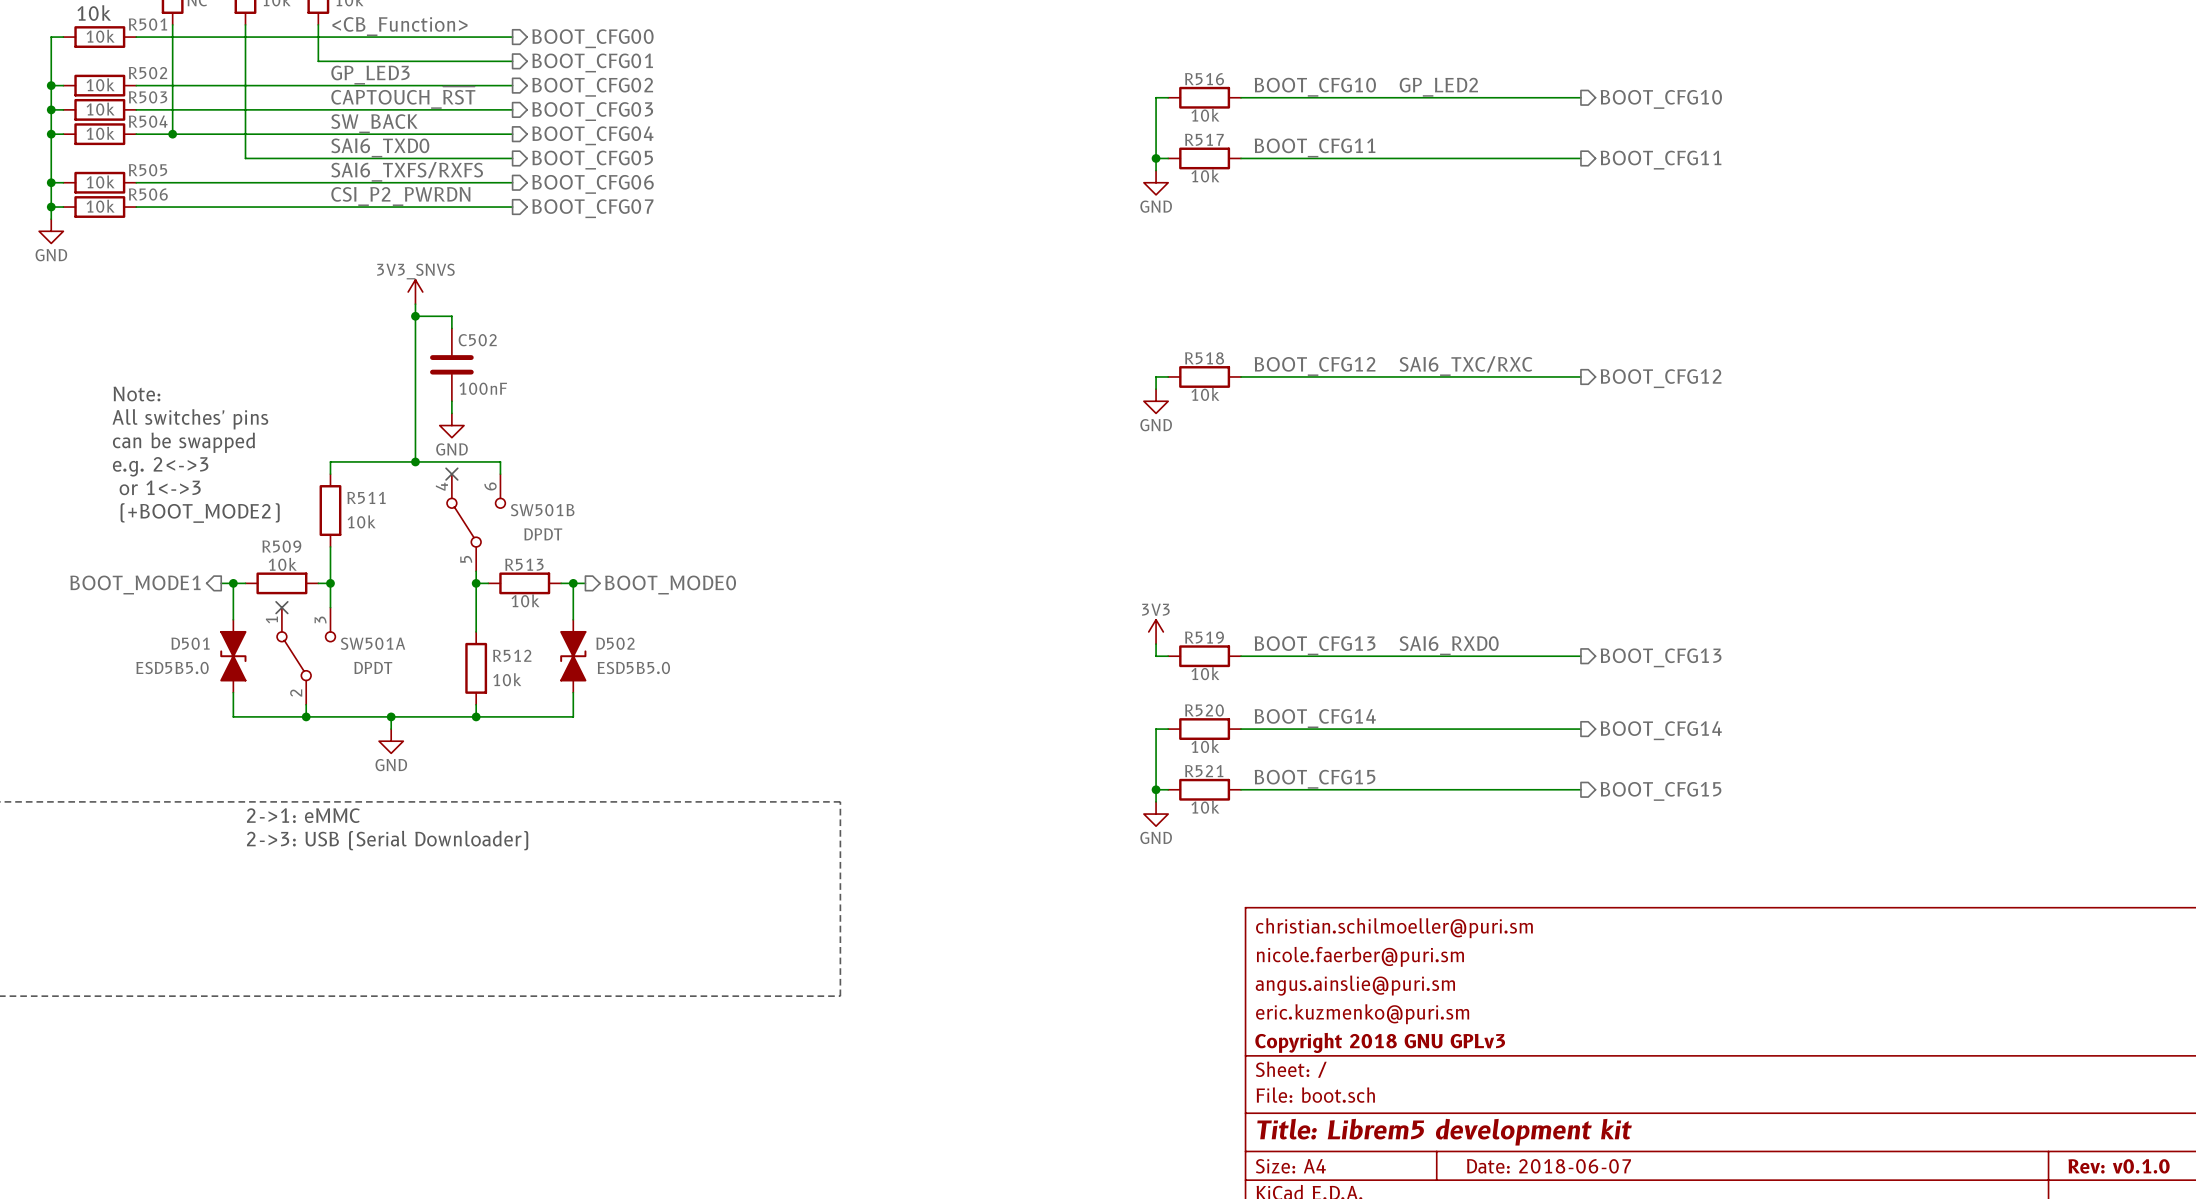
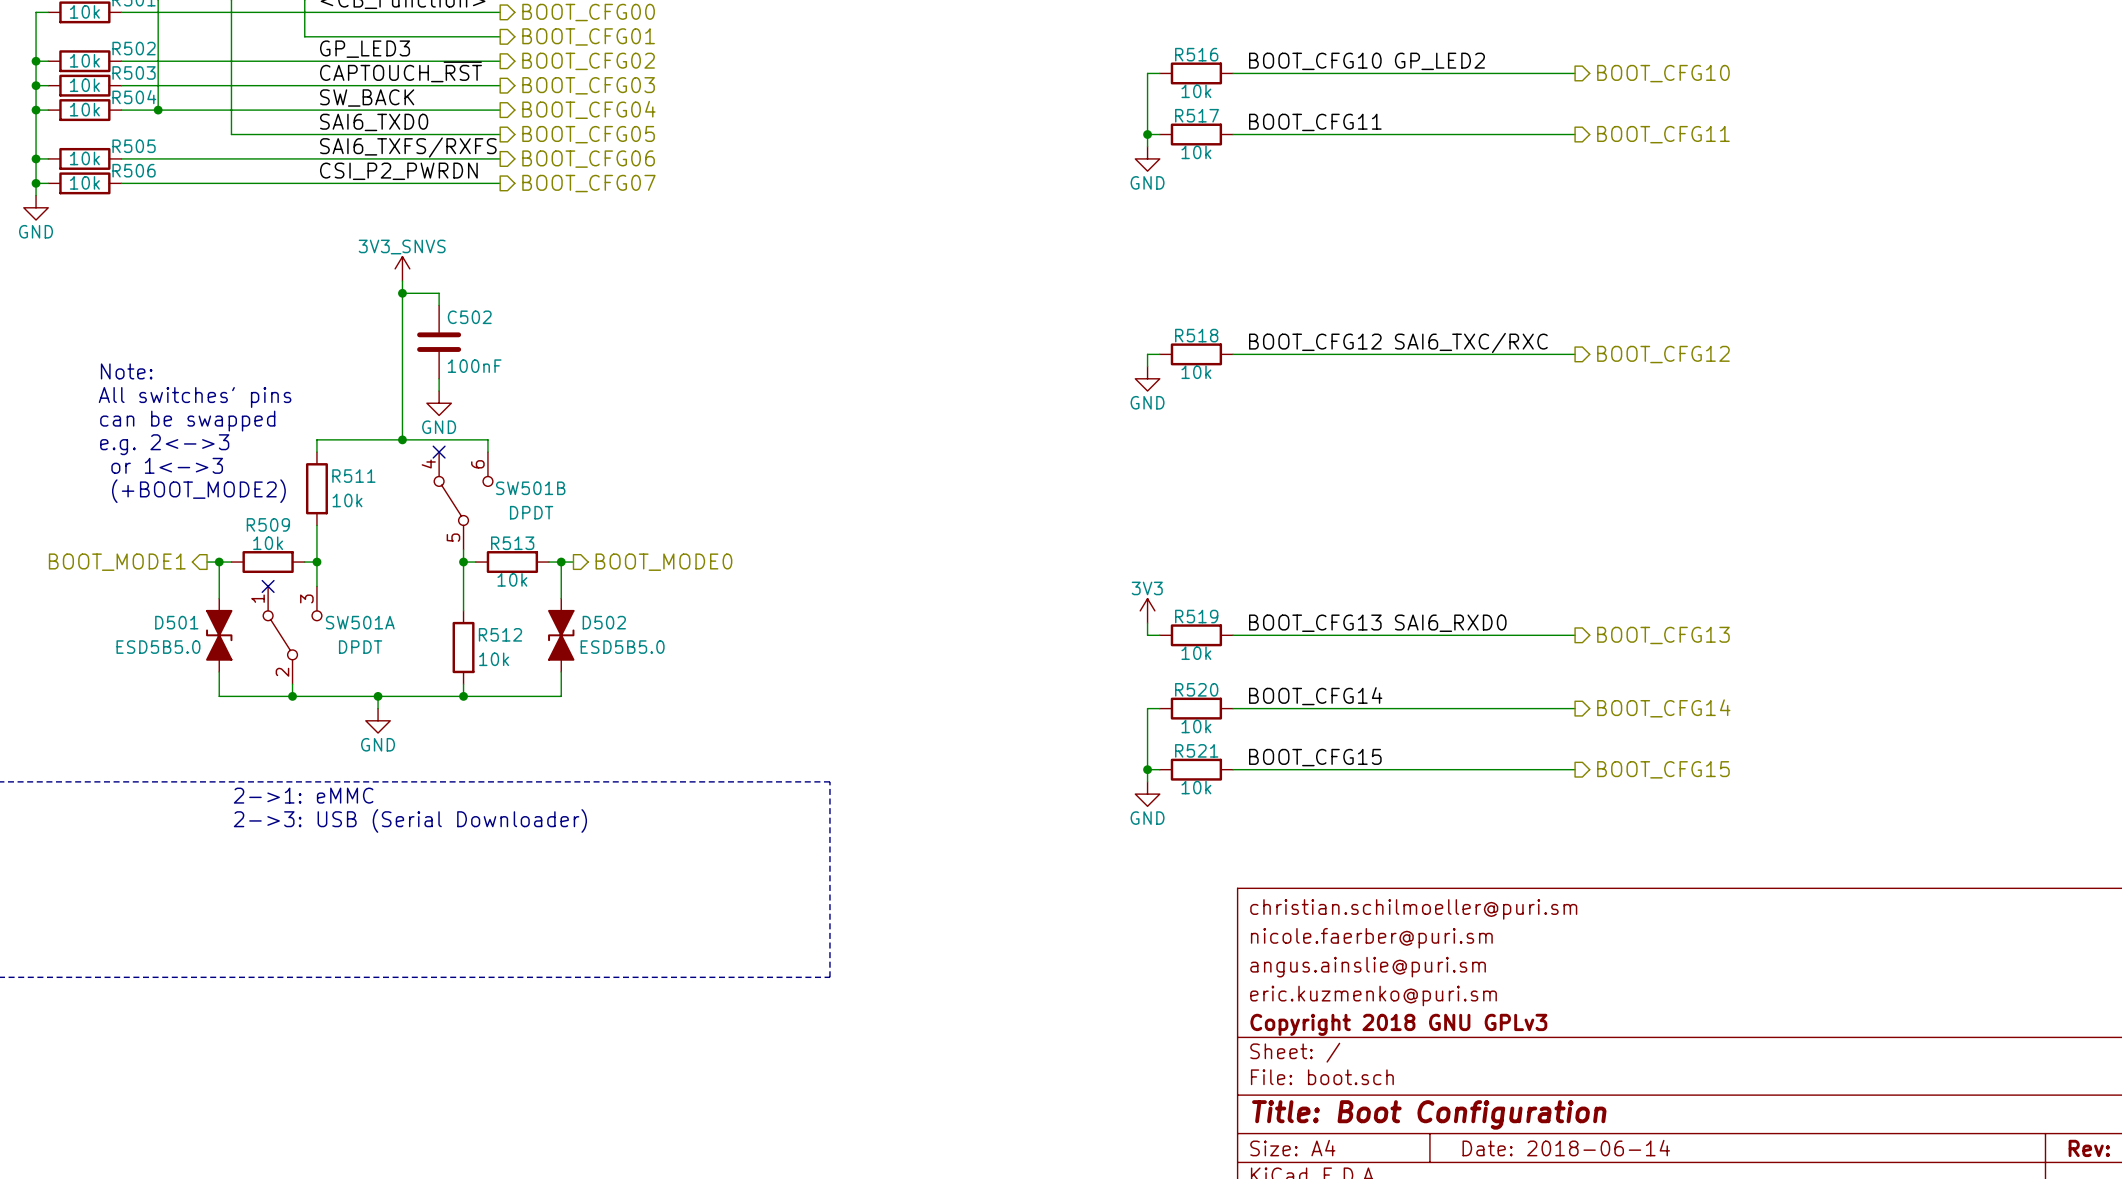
title block: Title: Librem5 development kit (1444, 1132) -> Title: Boot Configuration (1429, 1114)
title block: Date: 2018-06-07 (1548, 1166) -> Date: 2018-06-14 (1566, 1148)

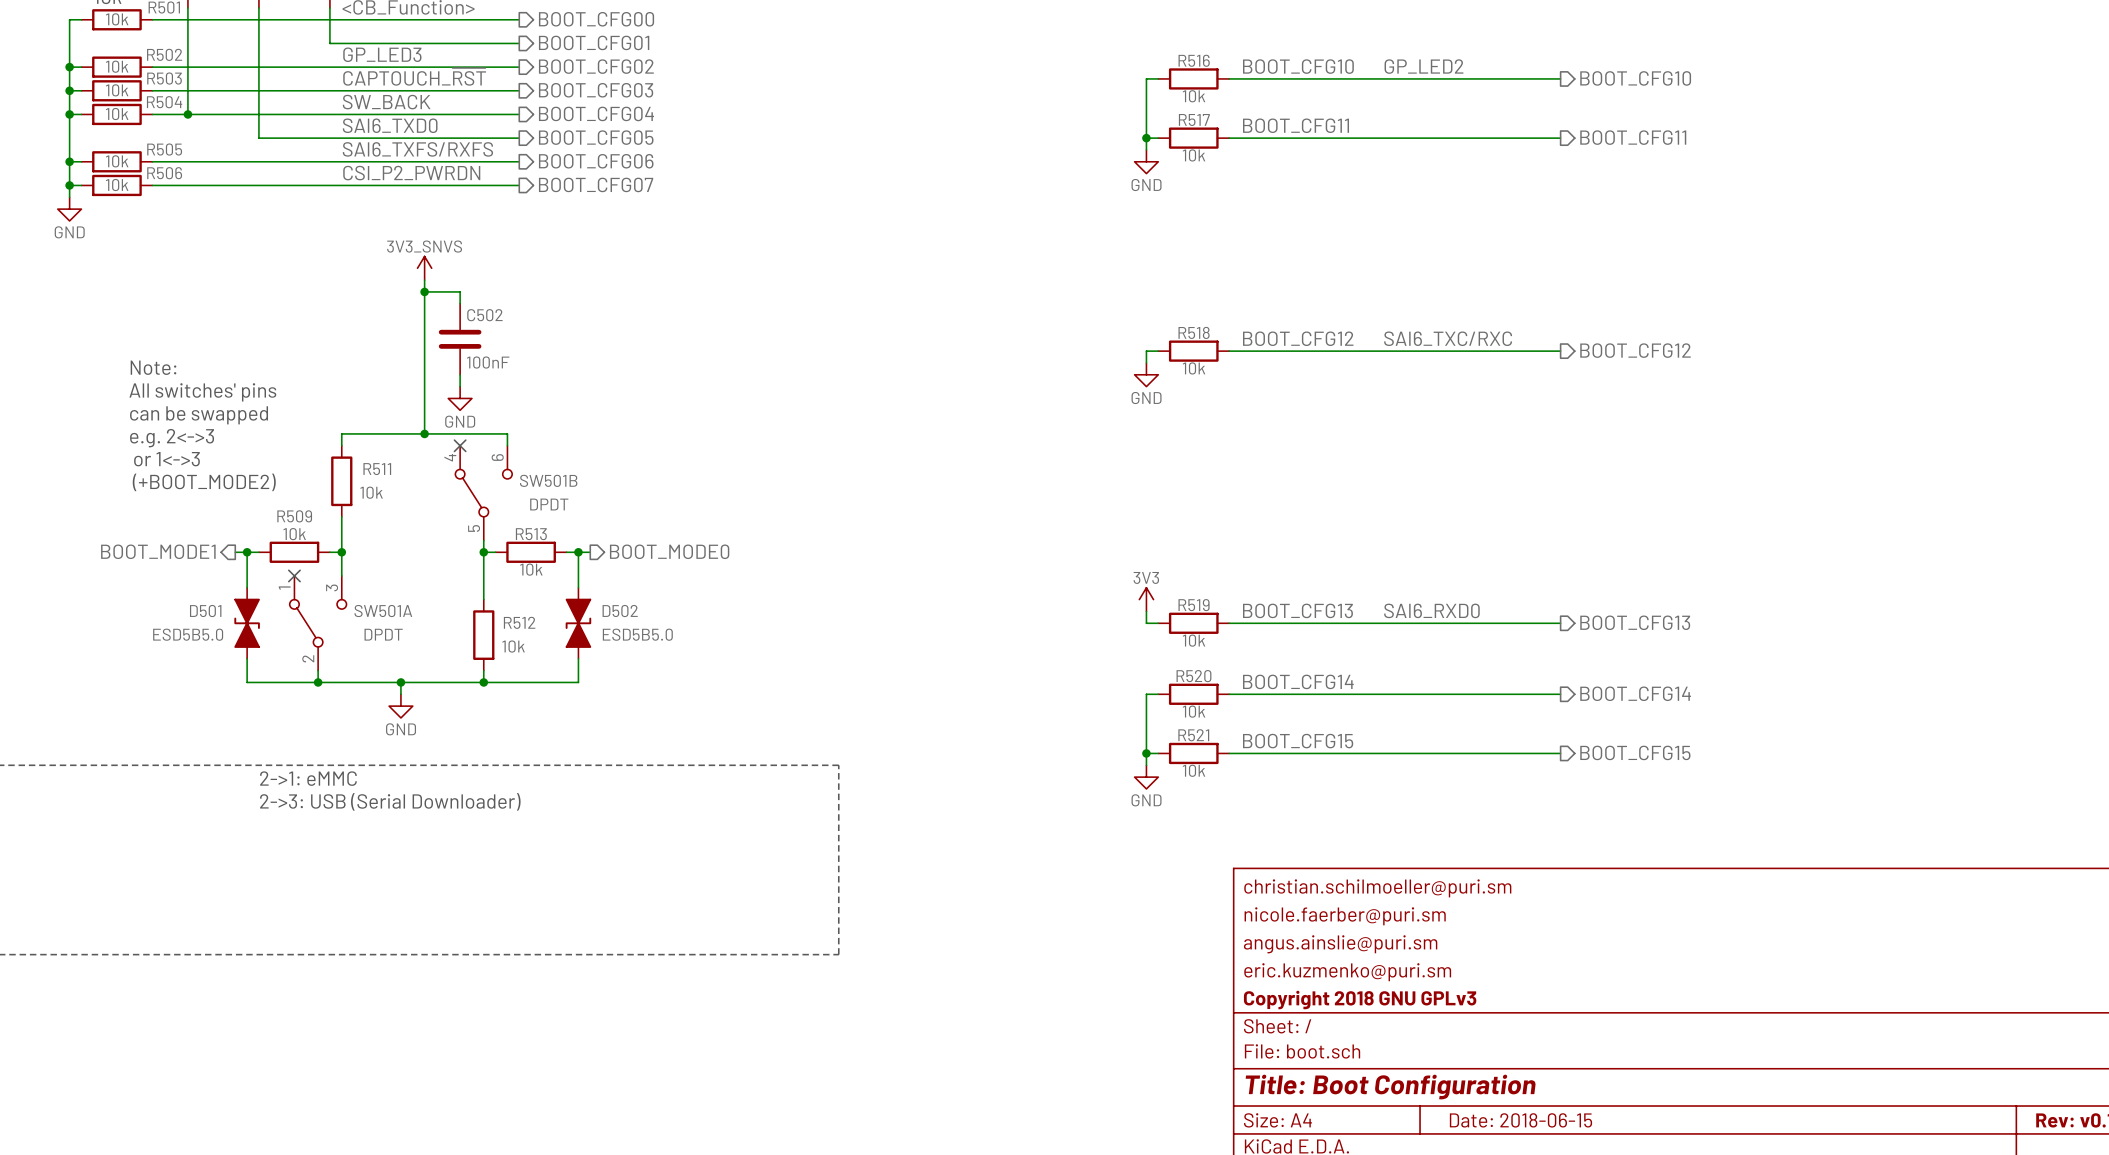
title block: Date: 2018-06-14 (1566, 1148) -> Date: 2018-06-15 (1520, 1120)

